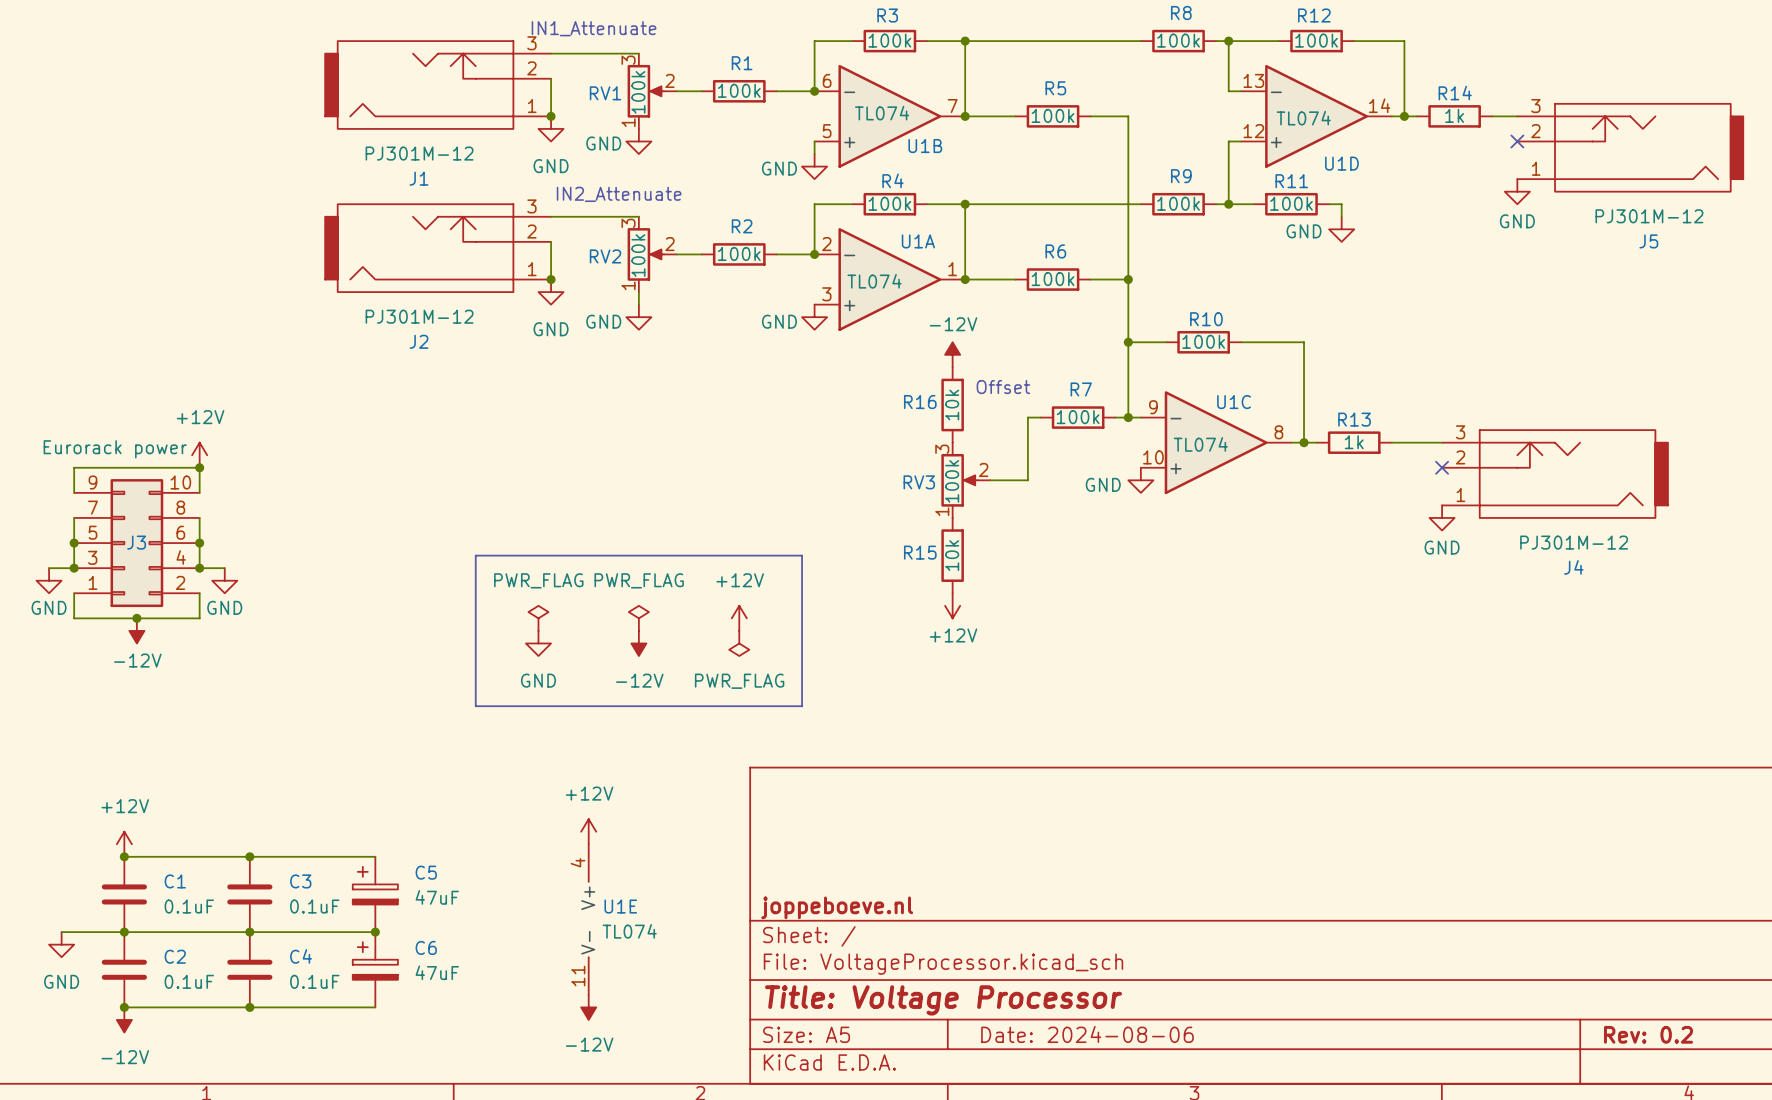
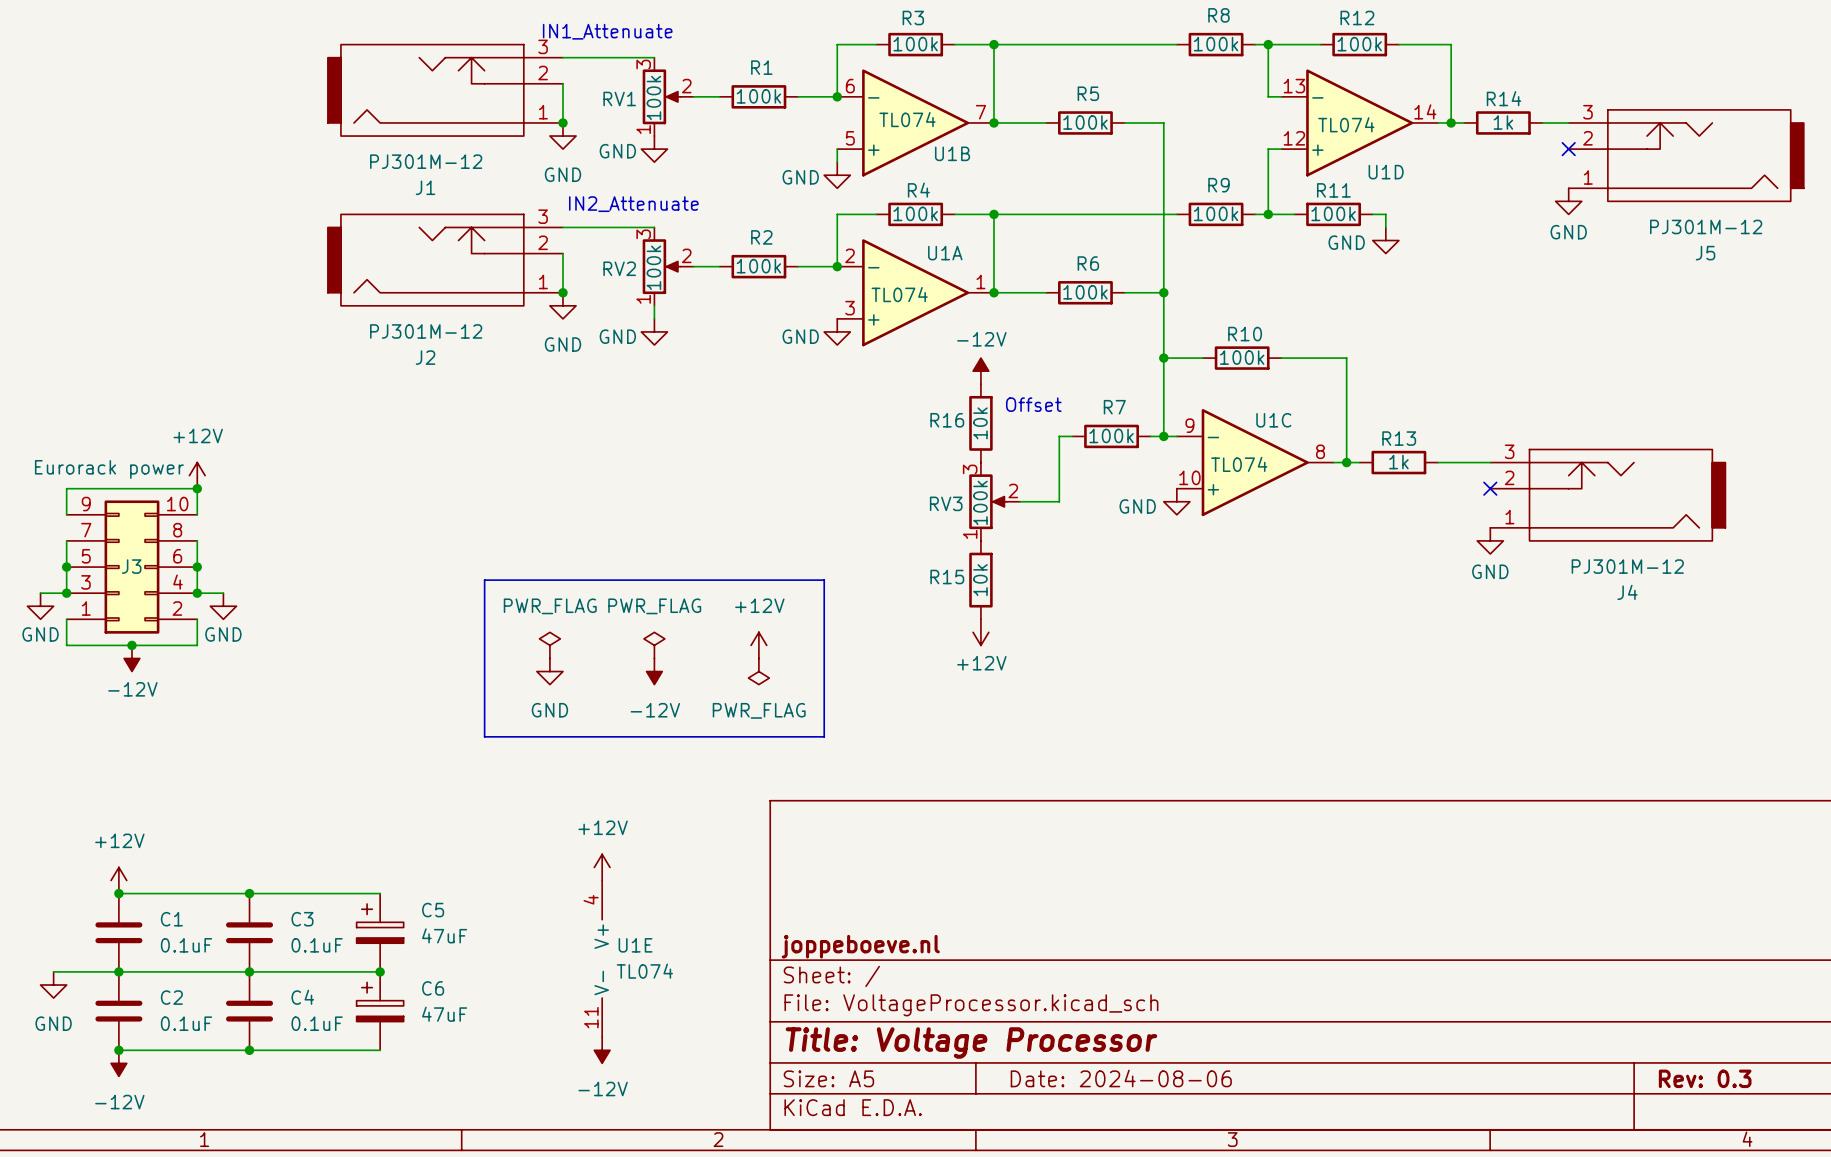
title block: Rev: 0.2 (1648, 1034) -> Rev: 0.3 (1705, 1078)

